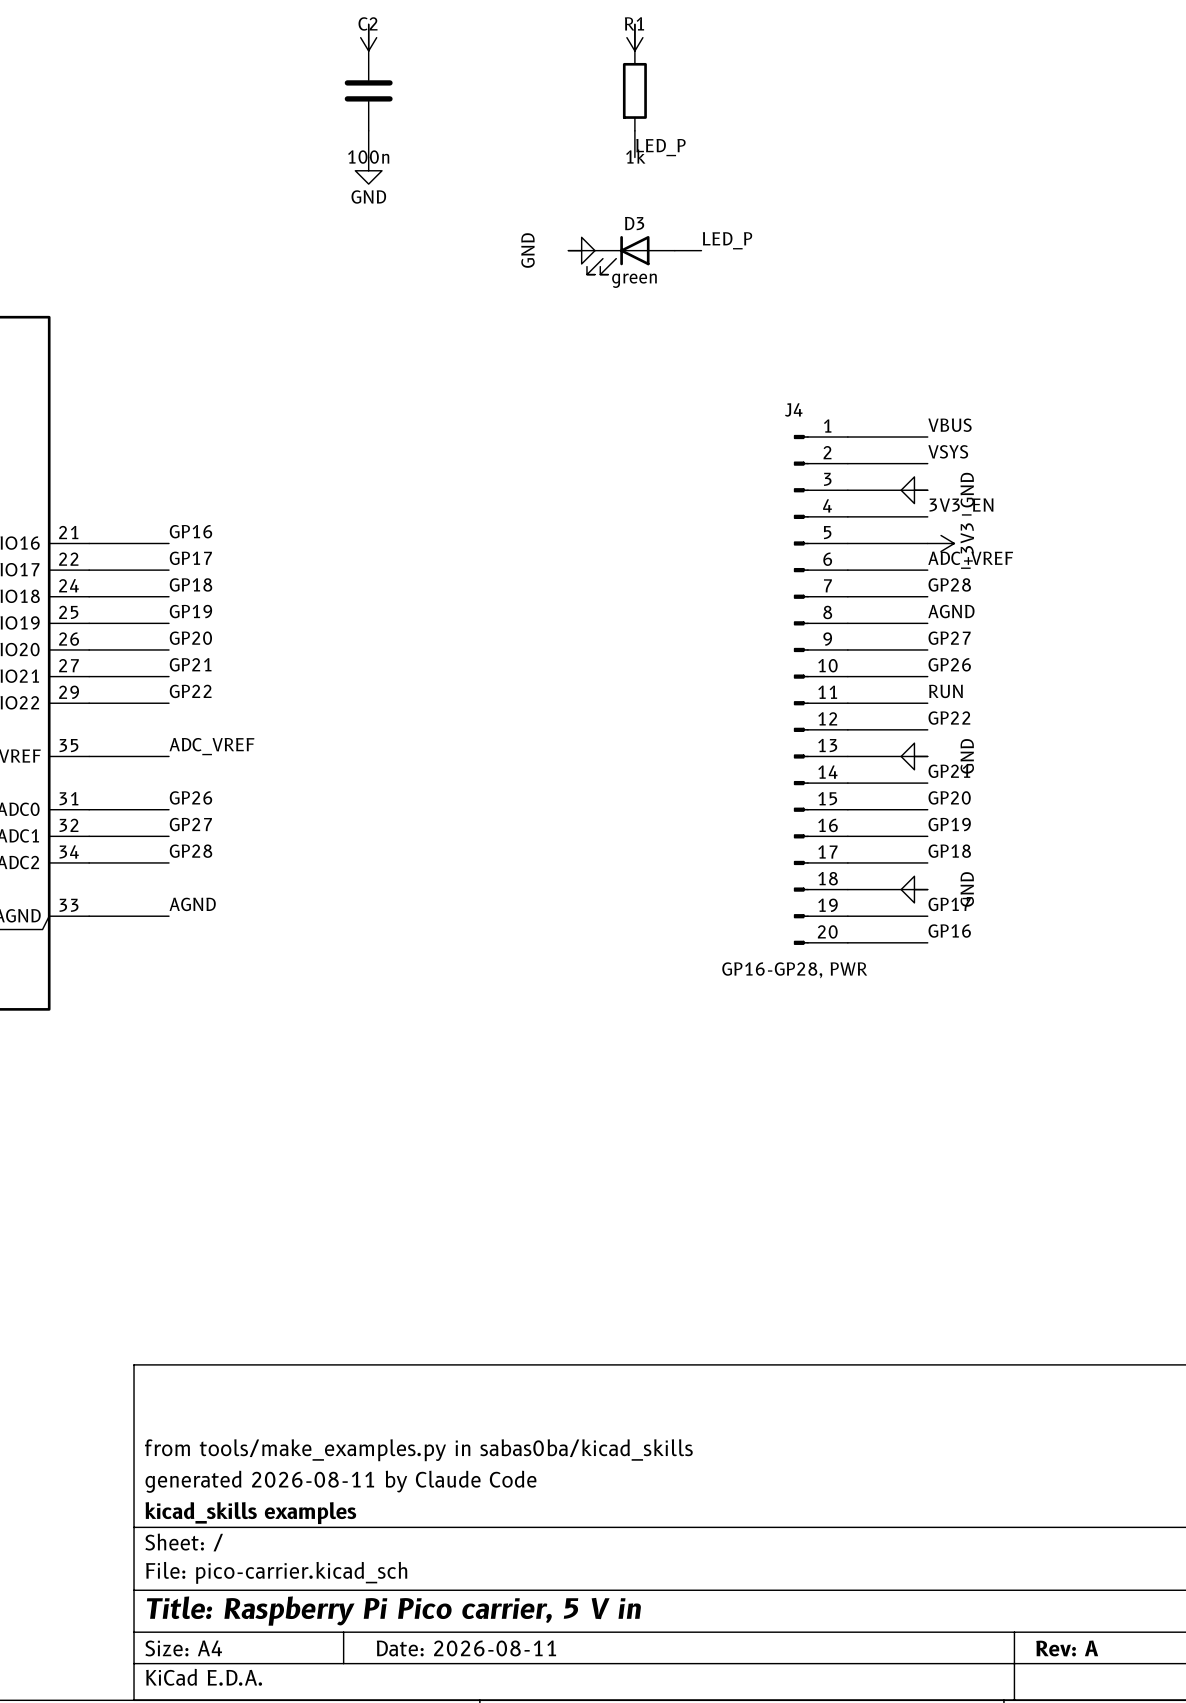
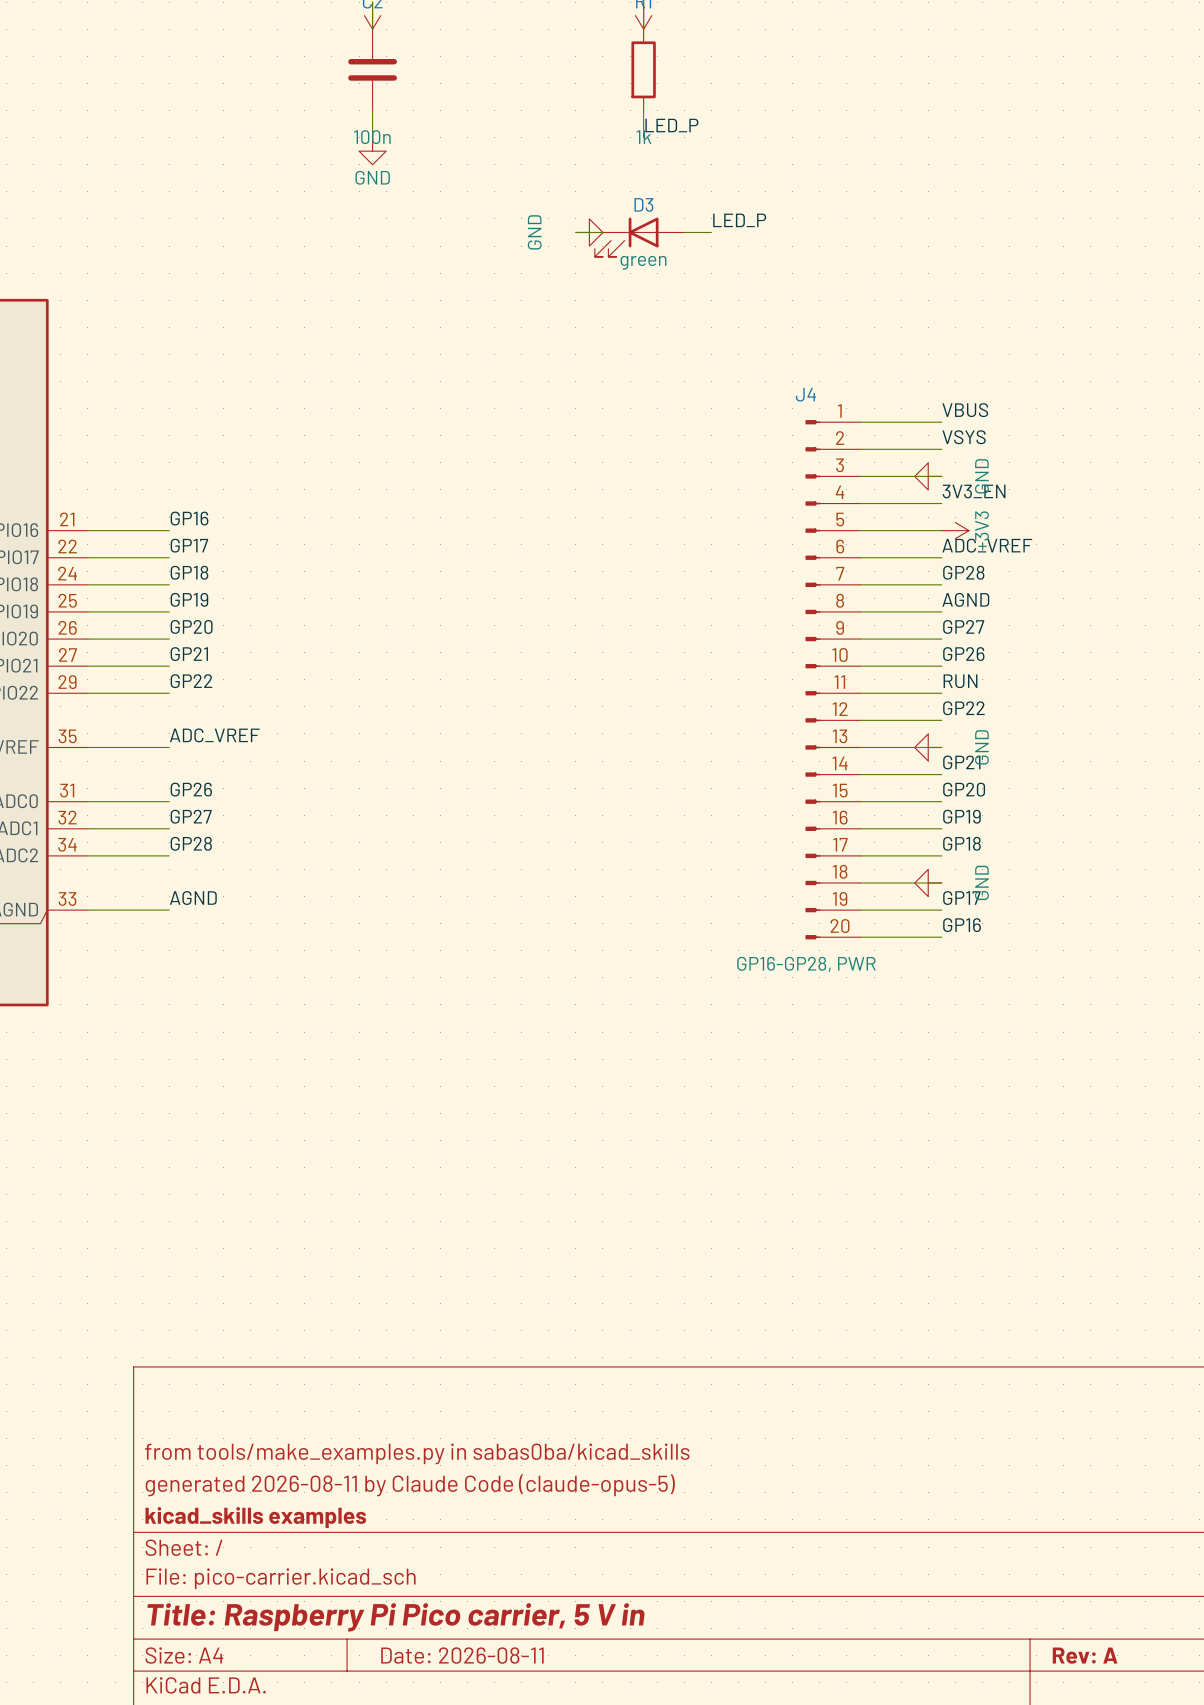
title block: generated 2026-08-11 by Claude Code (340, 1481) -> generated 2026-08-11 by Claude Code (claude-opus-5) (410, 1485)

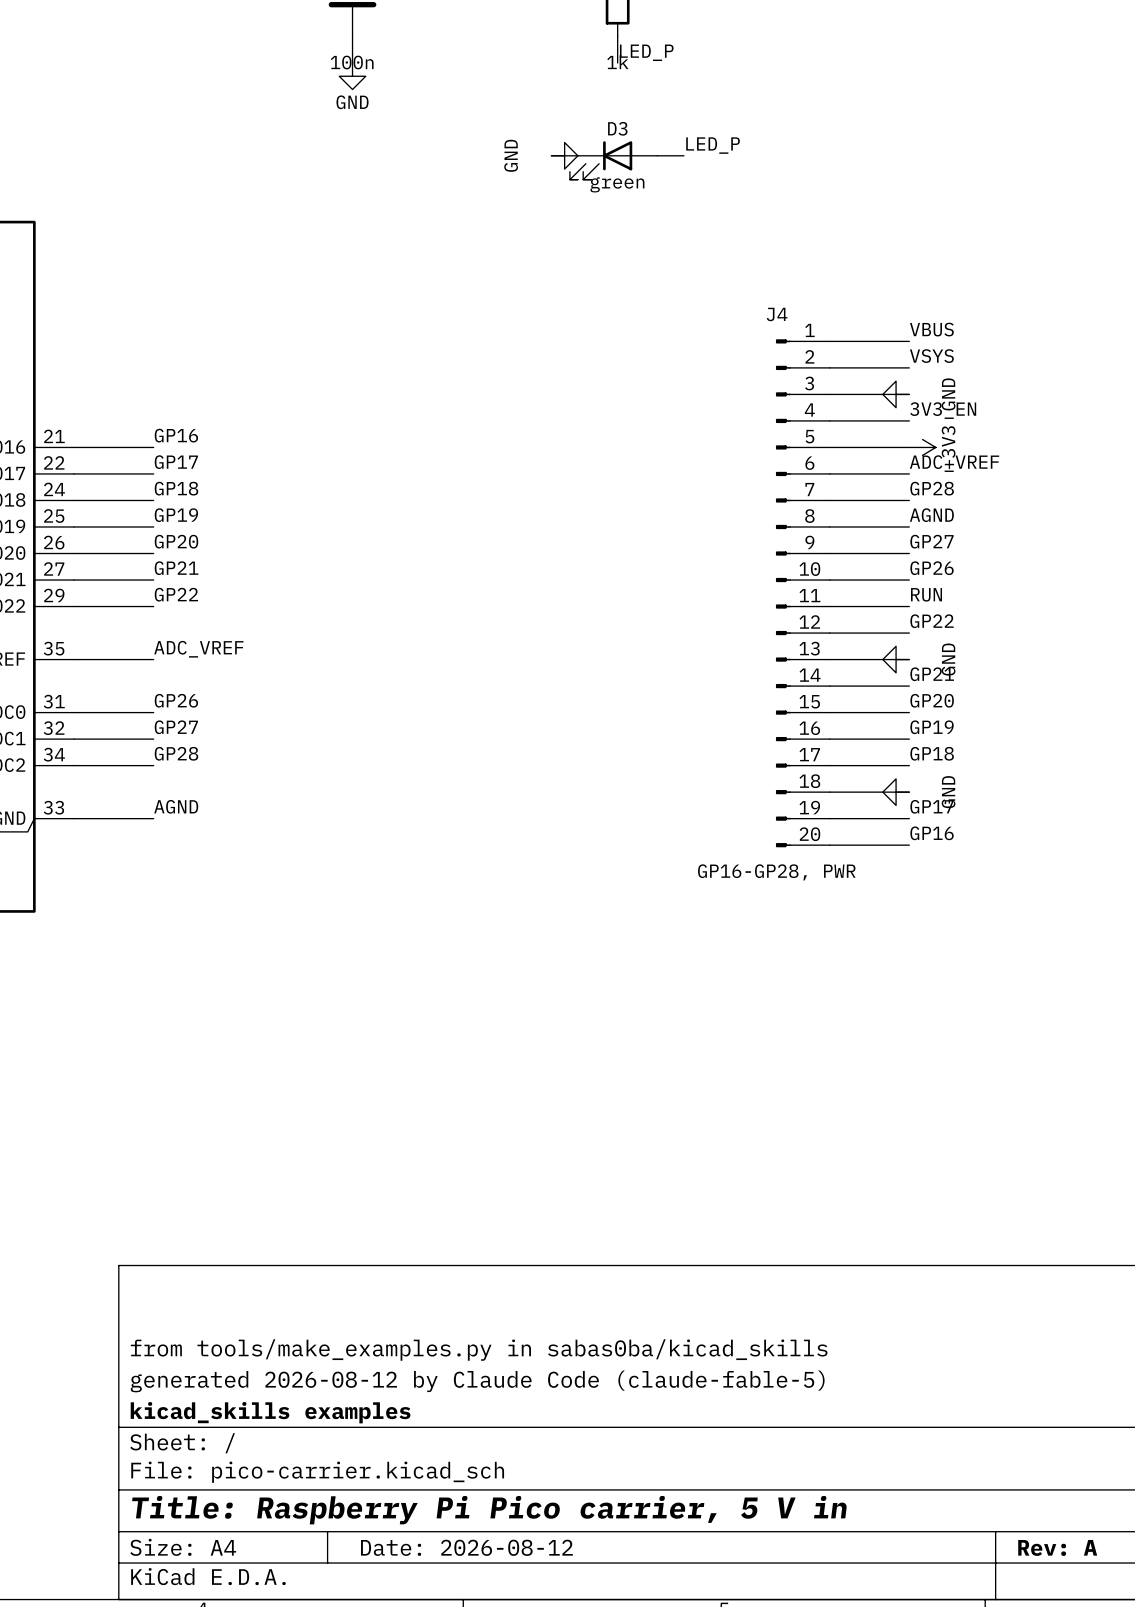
title block: generated 2026-08-11 by Claude Code (claude-opus-5) (410, 1485) -> generated 2026-08-12 by Claude Code (claude-fable-5) (477, 1381)
title block: Date: 2026-08-11 (462, 1655) -> Date: 2026-08-12 (466, 1547)

